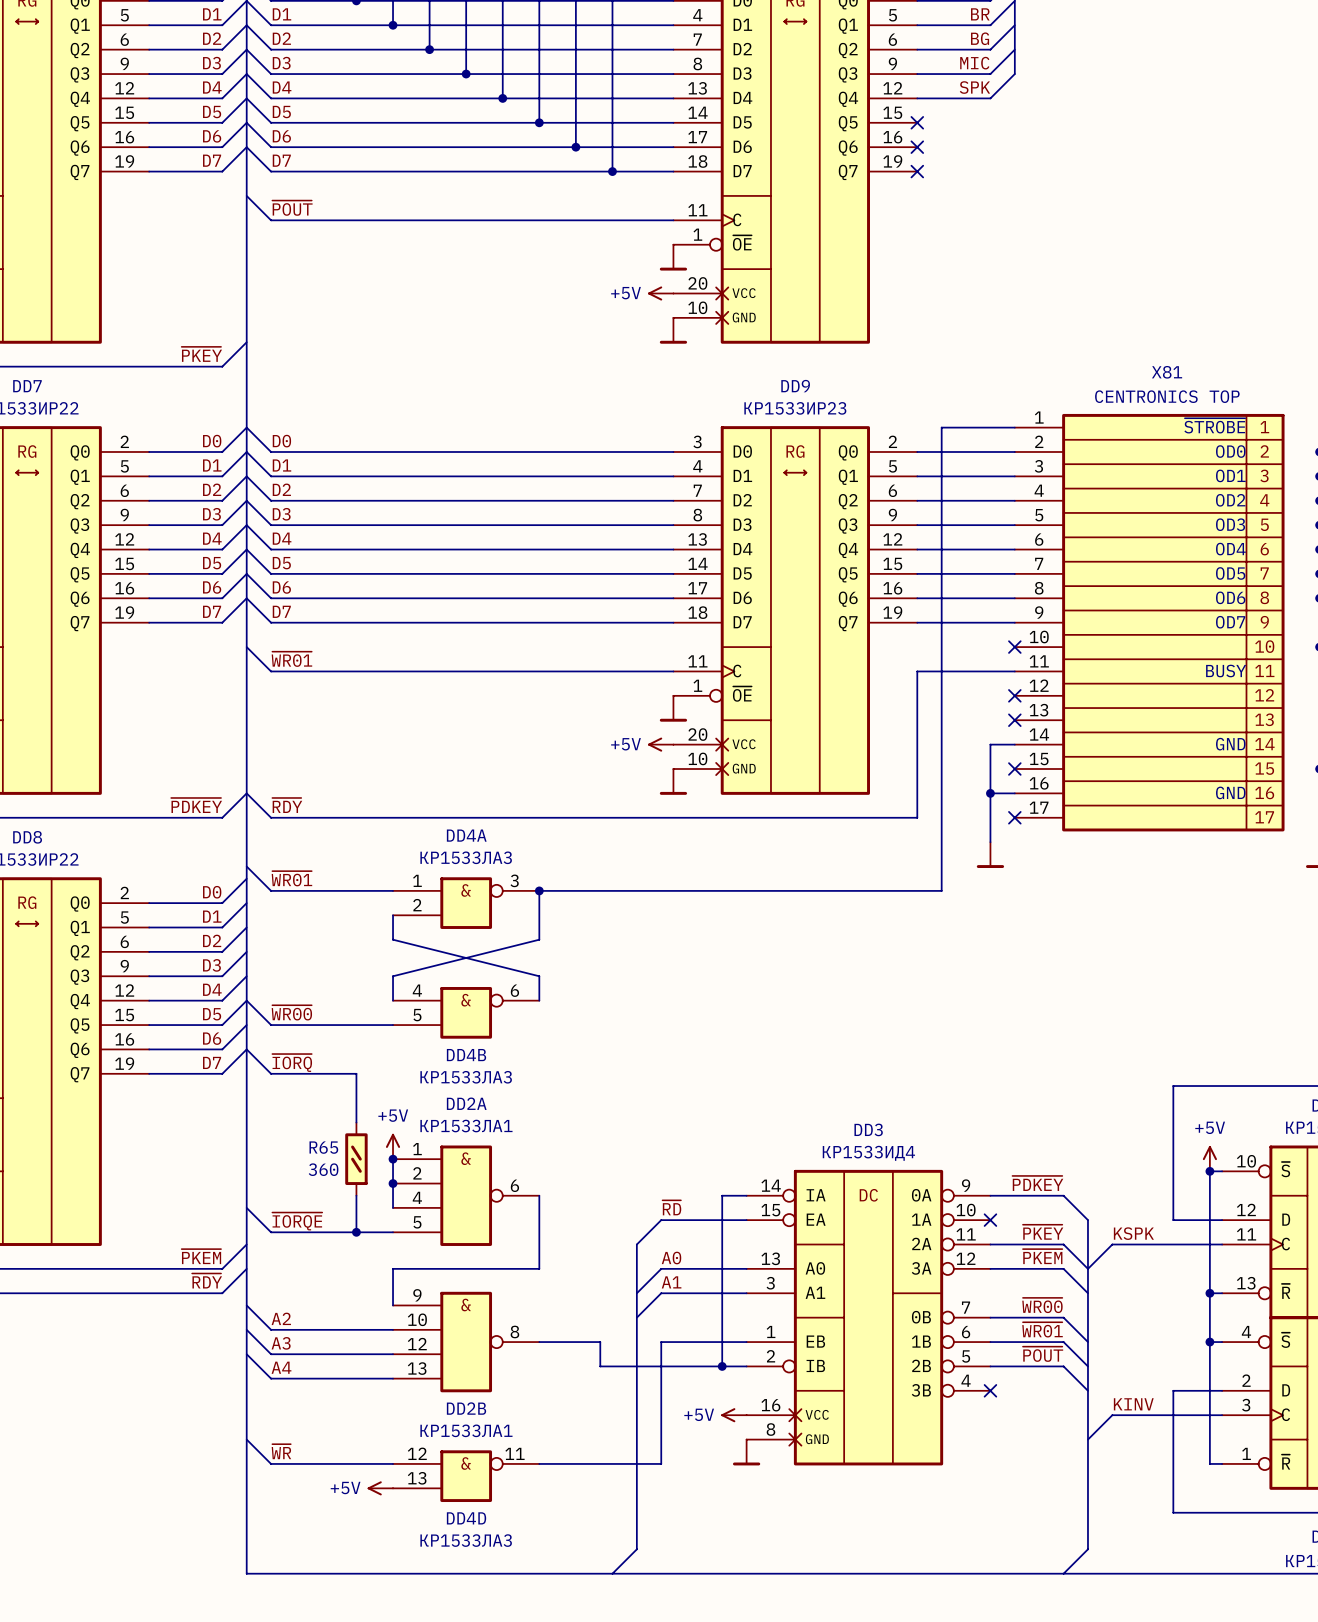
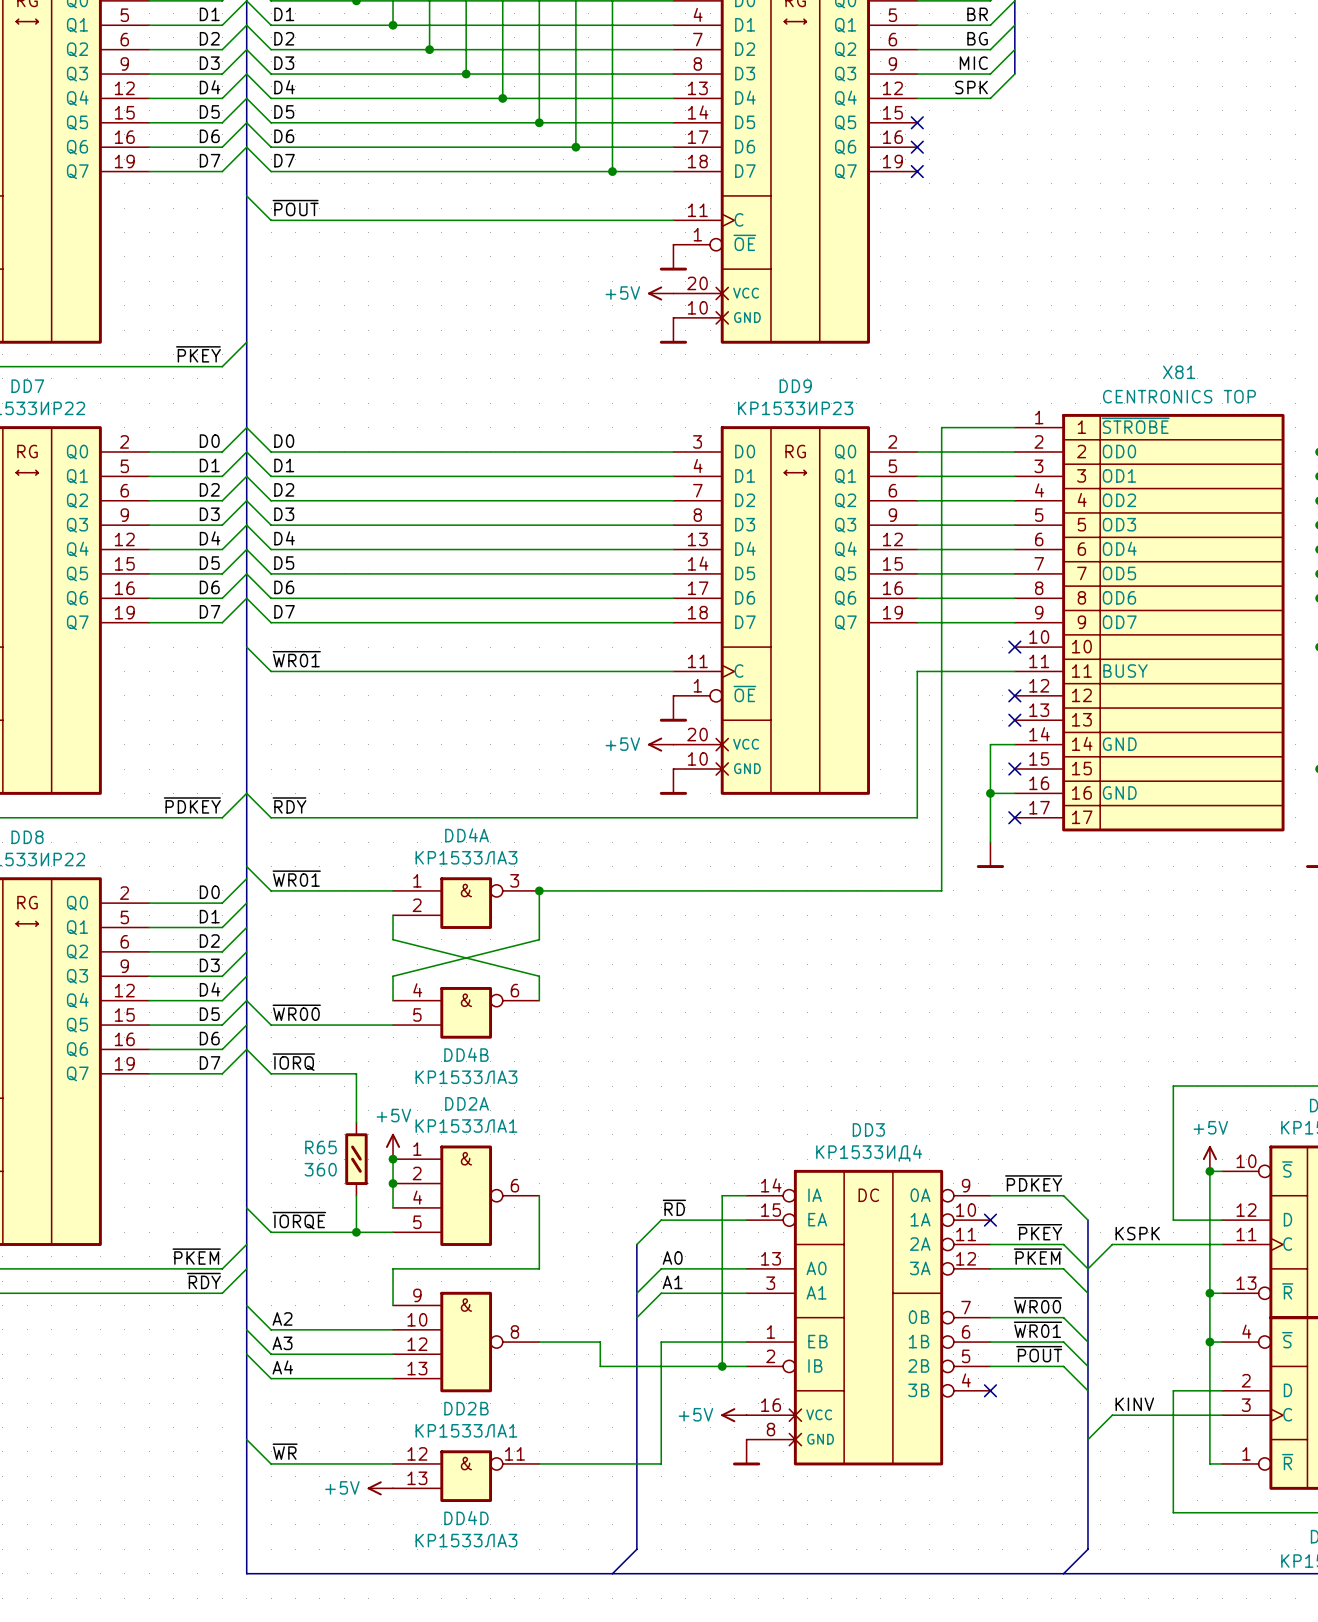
X81 symbol: [1014, 413, 1285, 832] -> [1014, 413, 1285, 832]
X81 text position: ~{STROBE} (1214, 425) -> ~{STROBE} (1135, 425)
X81 text position: OD0 (1230, 451) -> OD0 (1119, 451)
X81 text position: OD1 (1230, 475) -> OD1 (1119, 475)
X81 text position: OD2 (1230, 500) -> OD2 (1119, 500)
X81 text position: OD3 (1230, 524) -> OD3 (1119, 524)
X81 text position: OD4 (1230, 549) -> OD4 (1119, 548)
X81 text position: OD5 (1230, 573) -> OD5 (1119, 573)
X81 text position: OD6 (1230, 597) -> OD6 (1119, 597)
X81 text position: OD7 (1230, 622) -> OD7 (1119, 622)
X81 text position: BUSY (1226, 671) -> BUSY (1125, 671)
X81 text position: GND (1230, 744) -> GND (1119, 744)
X81 text position: GND (1230, 792) -> GND (1119, 792)

